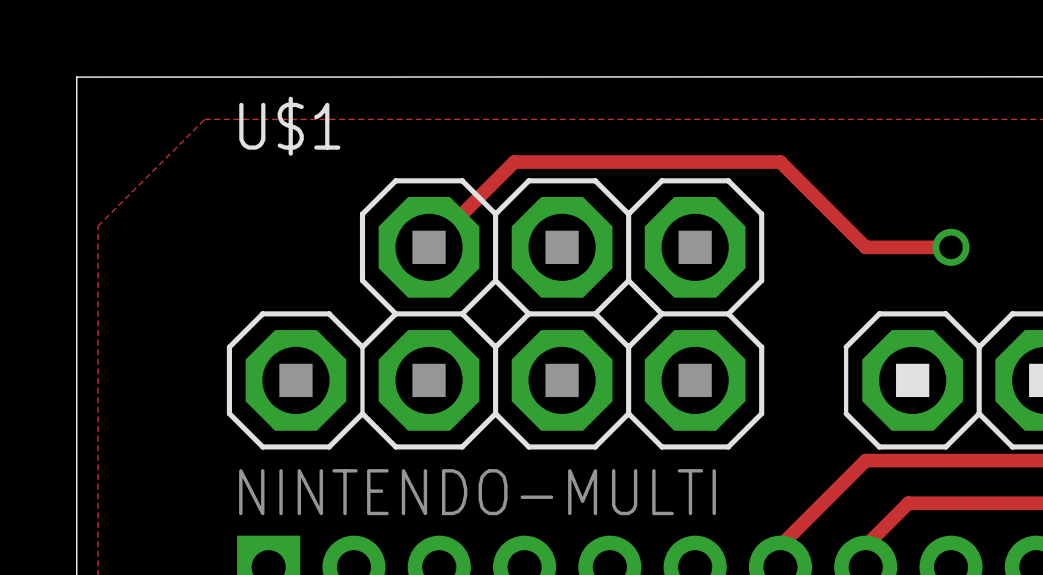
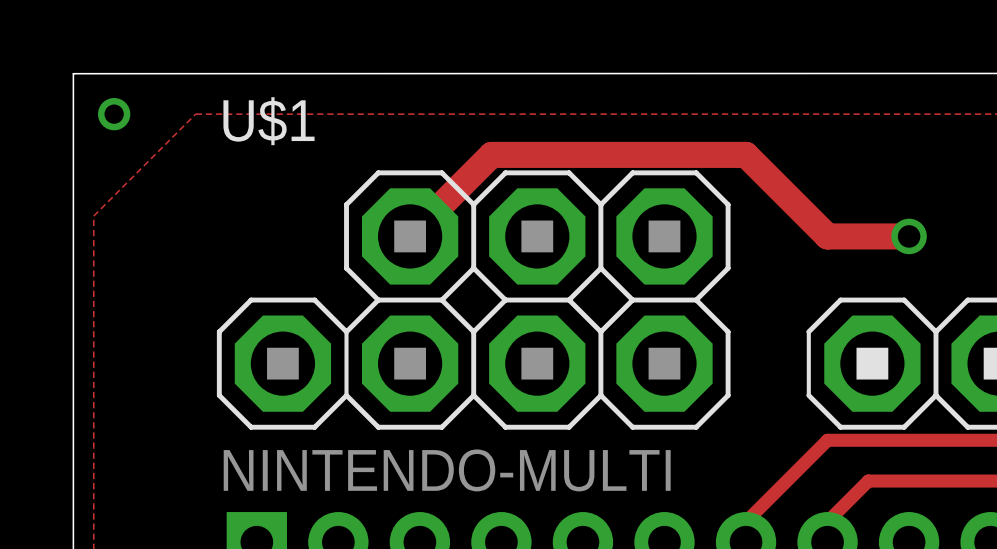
via: none -> (114, 114)
track width: thin (429, 247) (514, 162) (780, 162) (865, 247) (951, 247) -> thick (410, 236) (491, 154) (746, 154) (827, 236) (909, 236)

